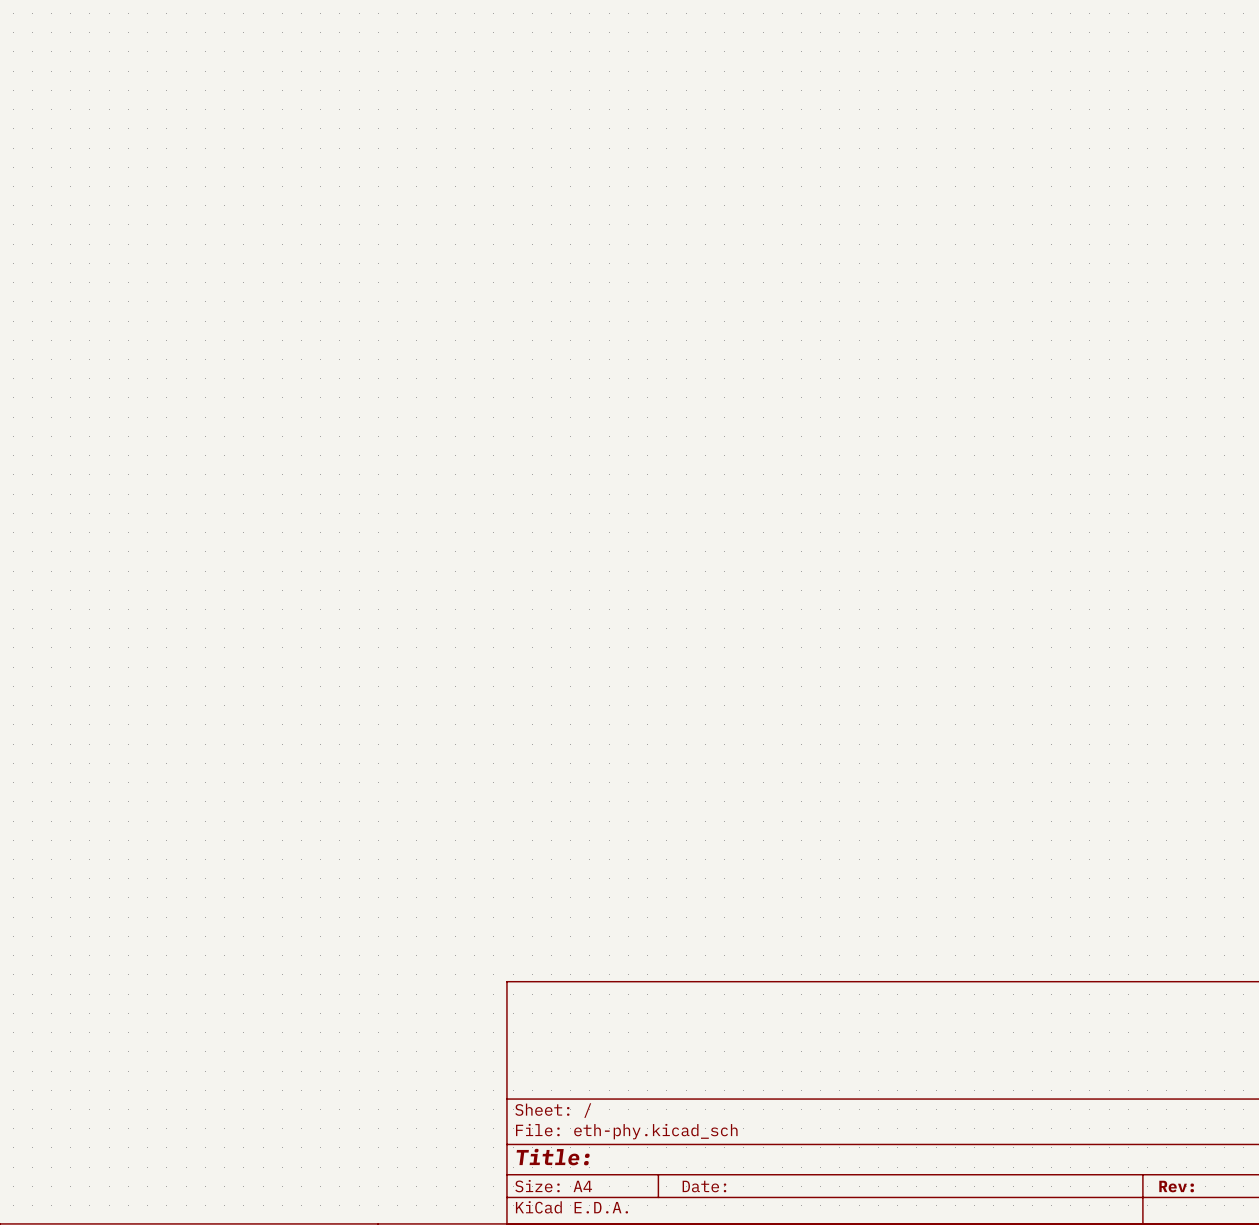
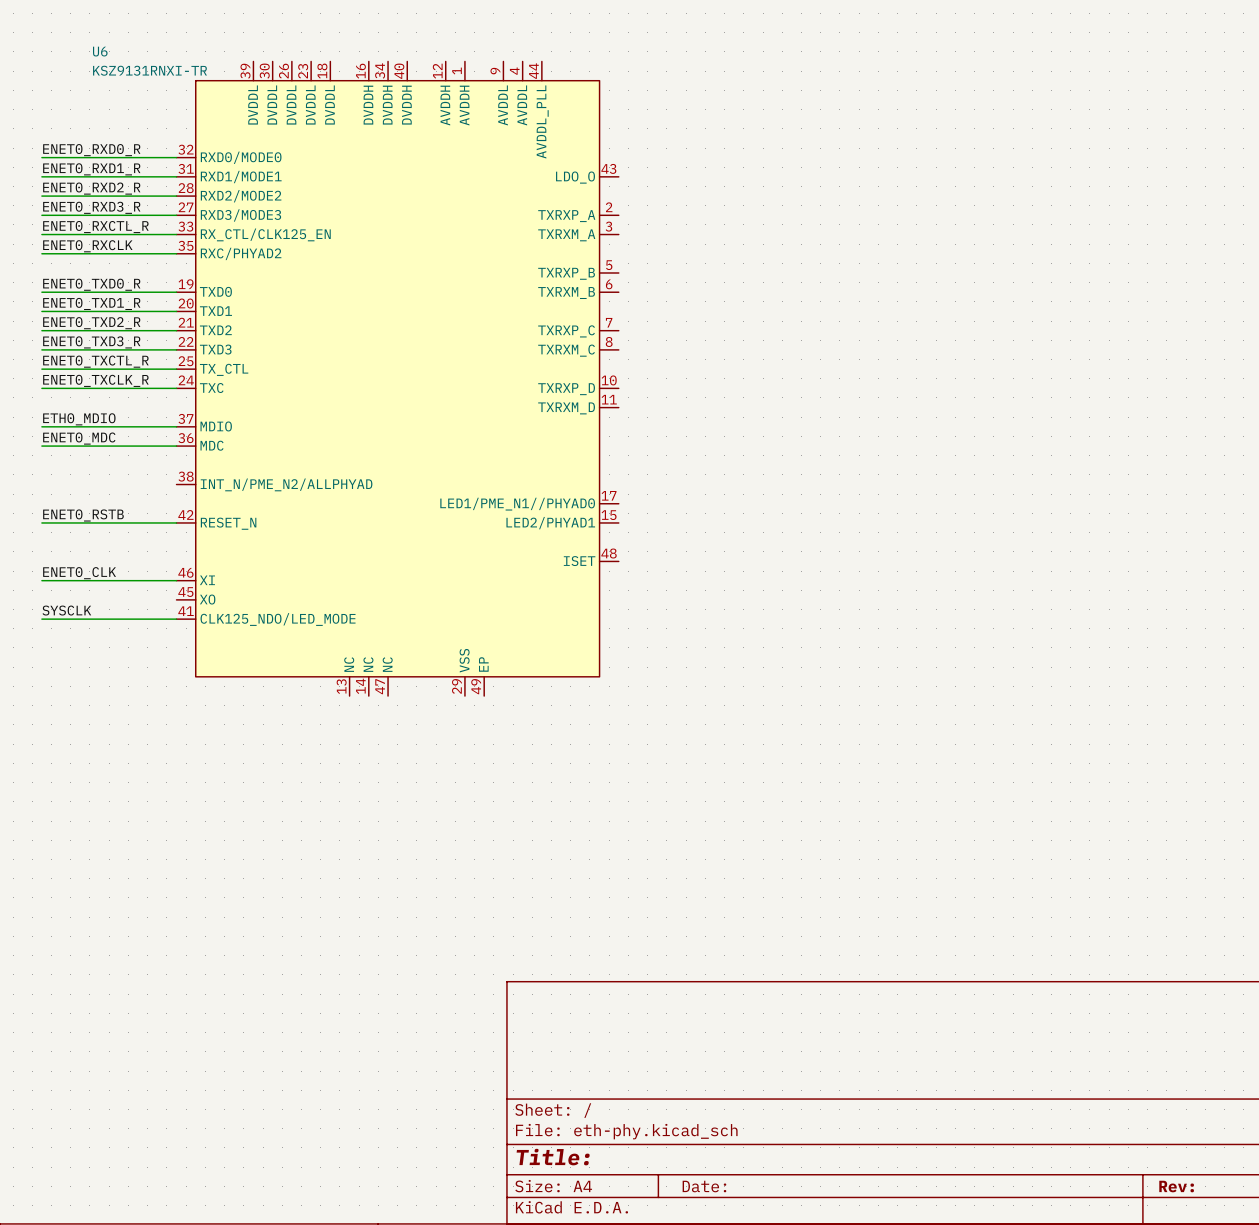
label: none -> ENET0_RXD0_R (91, 150)
wire: none -> (41, 157) (176, 157)
label: none -> ENET0_RXD1_R (91, 169)
wire: none -> (41, 176) (176, 176)
label: none -> ENET0_RXD2_R (91, 188)
wire: none -> (41, 196) (176, 196)
label: none -> ENET0_RXD3_R (91, 207)
wire: none -> (41, 215) (176, 215)
label: none -> ENET0_RXCTL_R (95, 227)
wire: none -> (41, 234) (176, 234)
label: none -> ENET0_RXCLK (87, 246)
wire: none -> (41, 253) (176, 253)
label: none -> ENET0_TXD0_R (91, 284)
wire: none -> (41, 292) (176, 292)
label: none -> ENET0_TXD1_R (91, 303)
wire: none -> (41, 311) (176, 311)
label: none -> ENET0_TXD2_R (91, 323)
wire: none -> (41, 330) (176, 330)
label: none -> ENET0_TXD3_R (91, 342)
wire: none -> (41, 349) (176, 349)
label: none -> ENET0_TXCTL_R (95, 361)
wire: none -> (41, 369) (176, 369)
U6: none -> KSZ9131RNXI-TR (397, 378)
label: none -> ENET0_TXCLK_R (95, 380)
wire: none -> (41, 388) (176, 388)
label: none -> ETH0_MDIO (79, 419)
wire: none -> (41, 426) (176, 426)
label: none -> ENET0_MDC (79, 438)
wire: none -> (41, 446) (176, 446)
label: none -> ENET0_RSTB (83, 515)
wire: none -> (41, 522) (176, 522)
label: none -> ENET0_CLK (79, 573)
wire: none -> (41, 580) (176, 580)
label: none -> SYSCLK (66, 610)
wire: none -> (41, 619) (176, 619)

